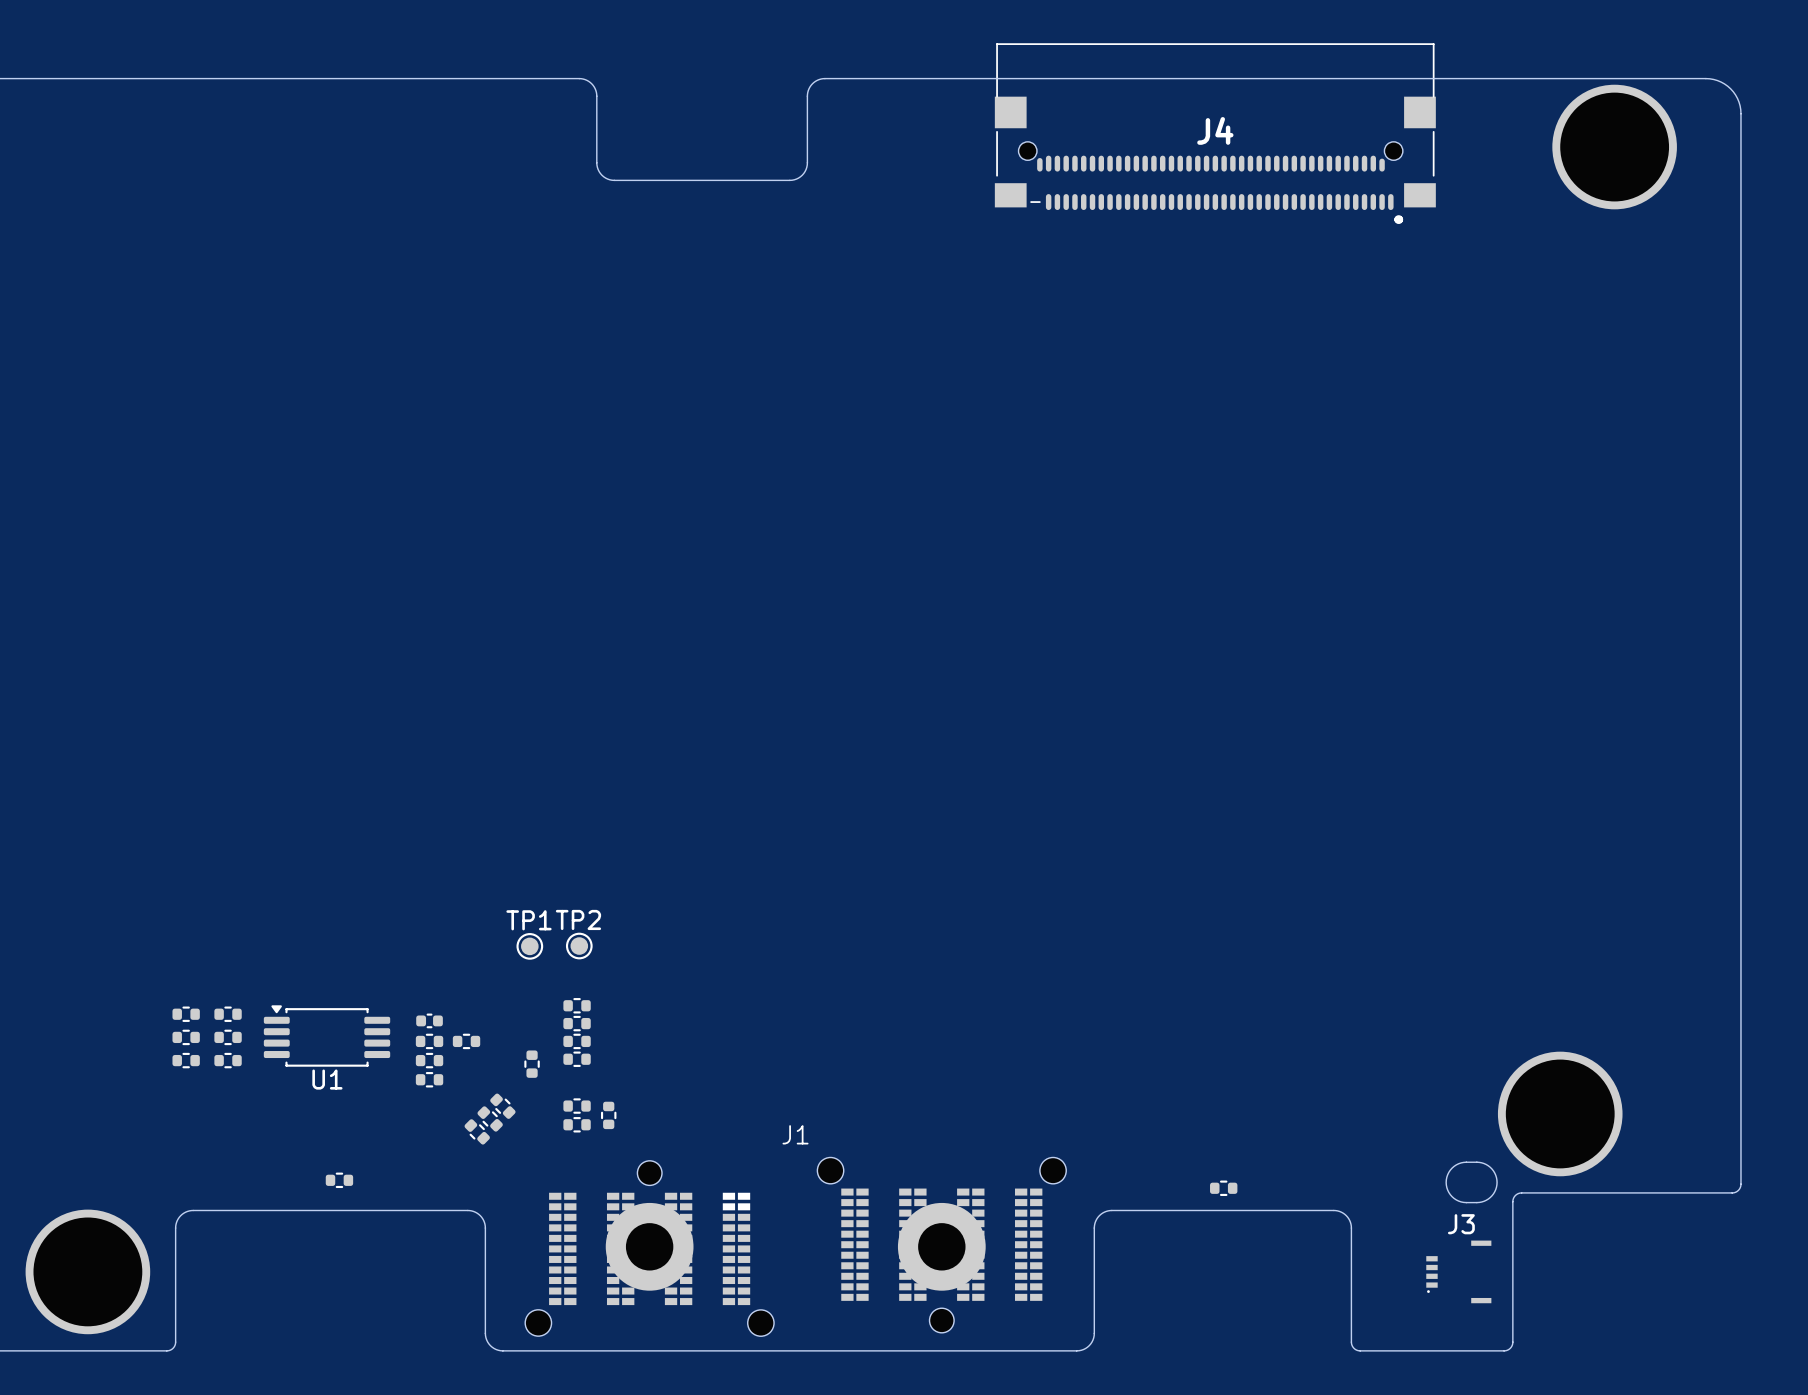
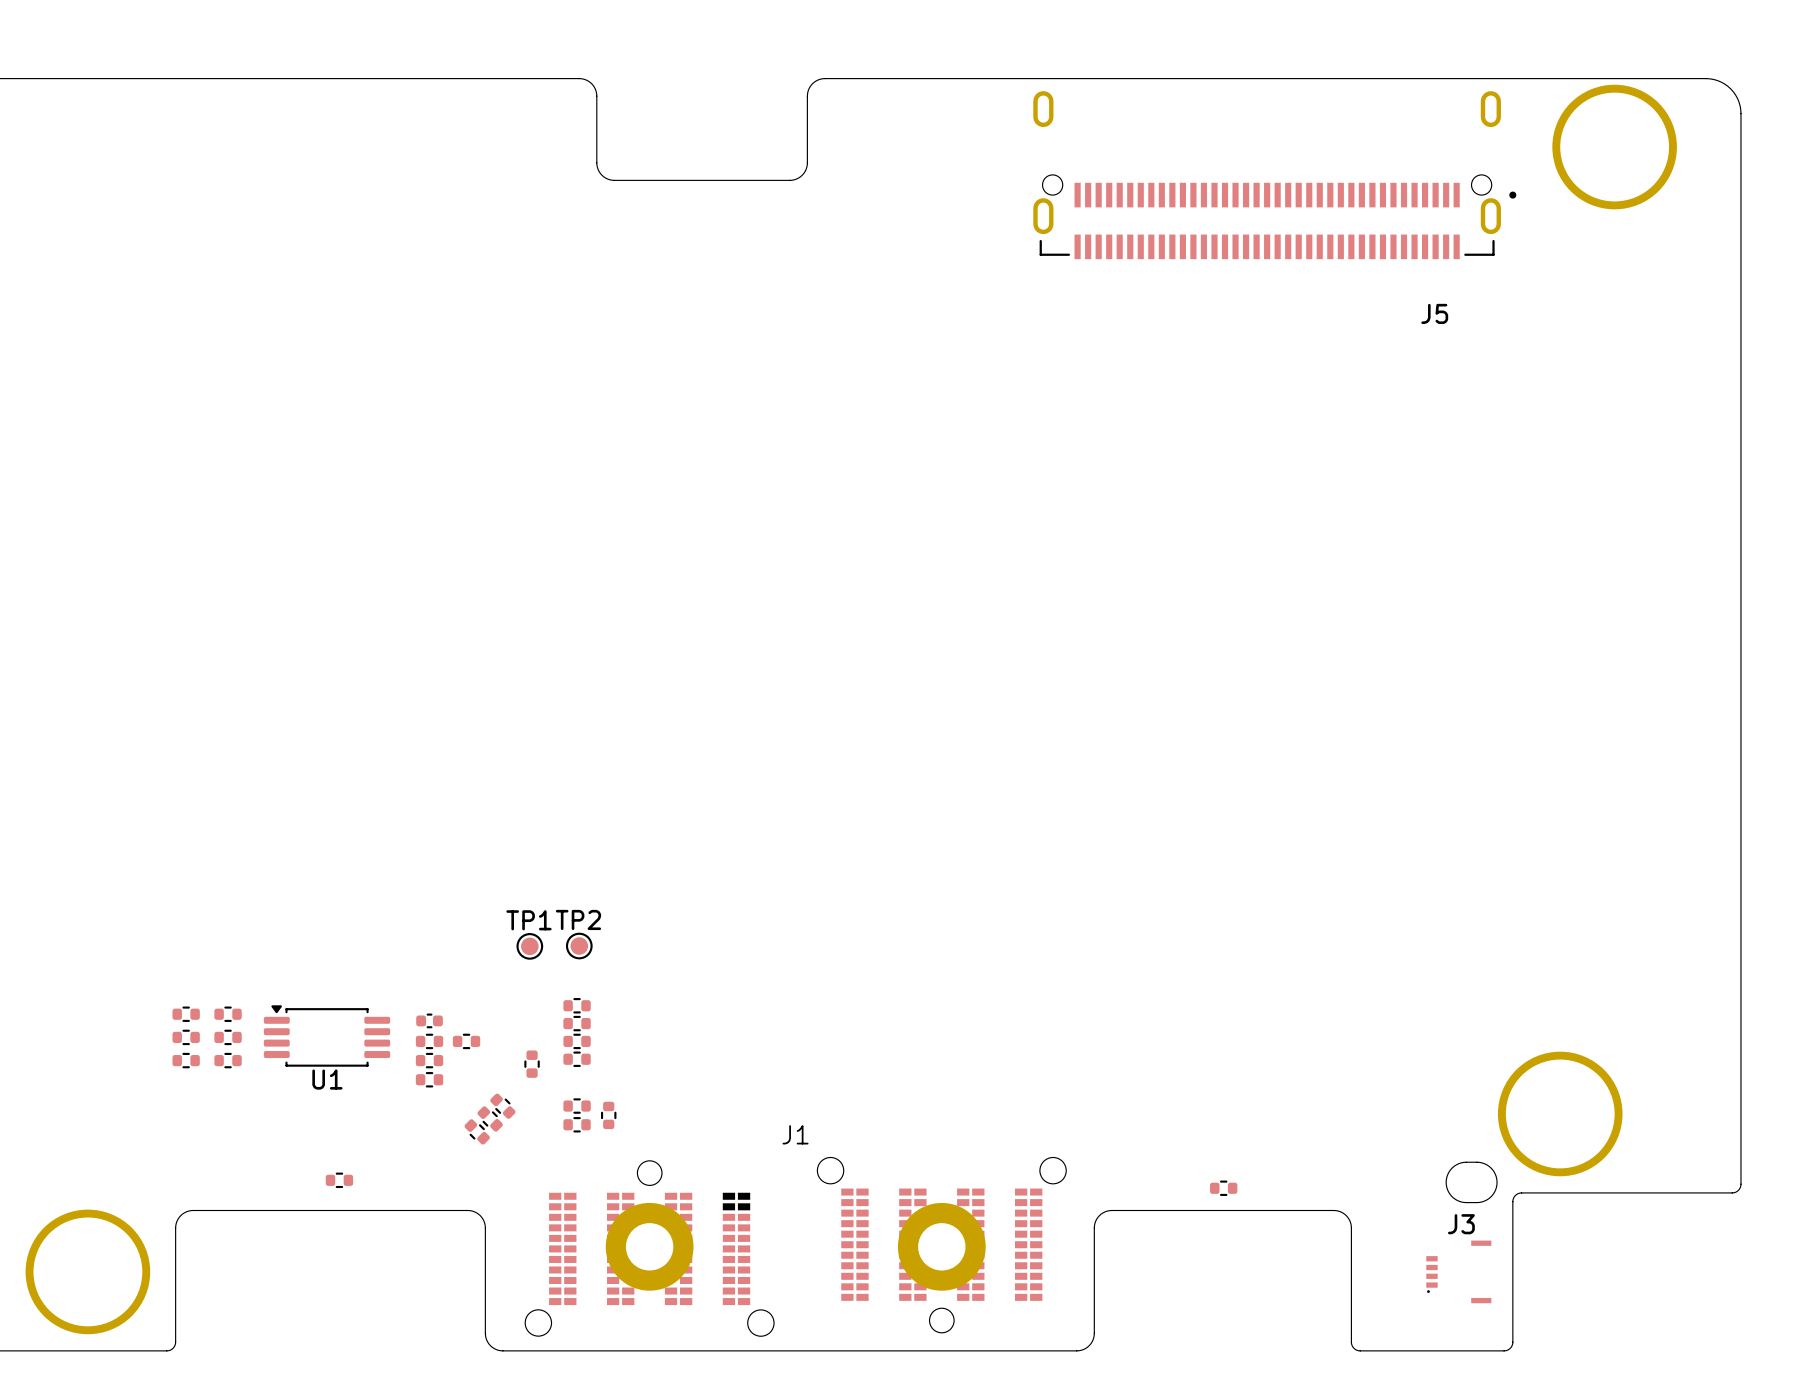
J4: (1215, 133) -> none
J5: none -> (1274, 175)

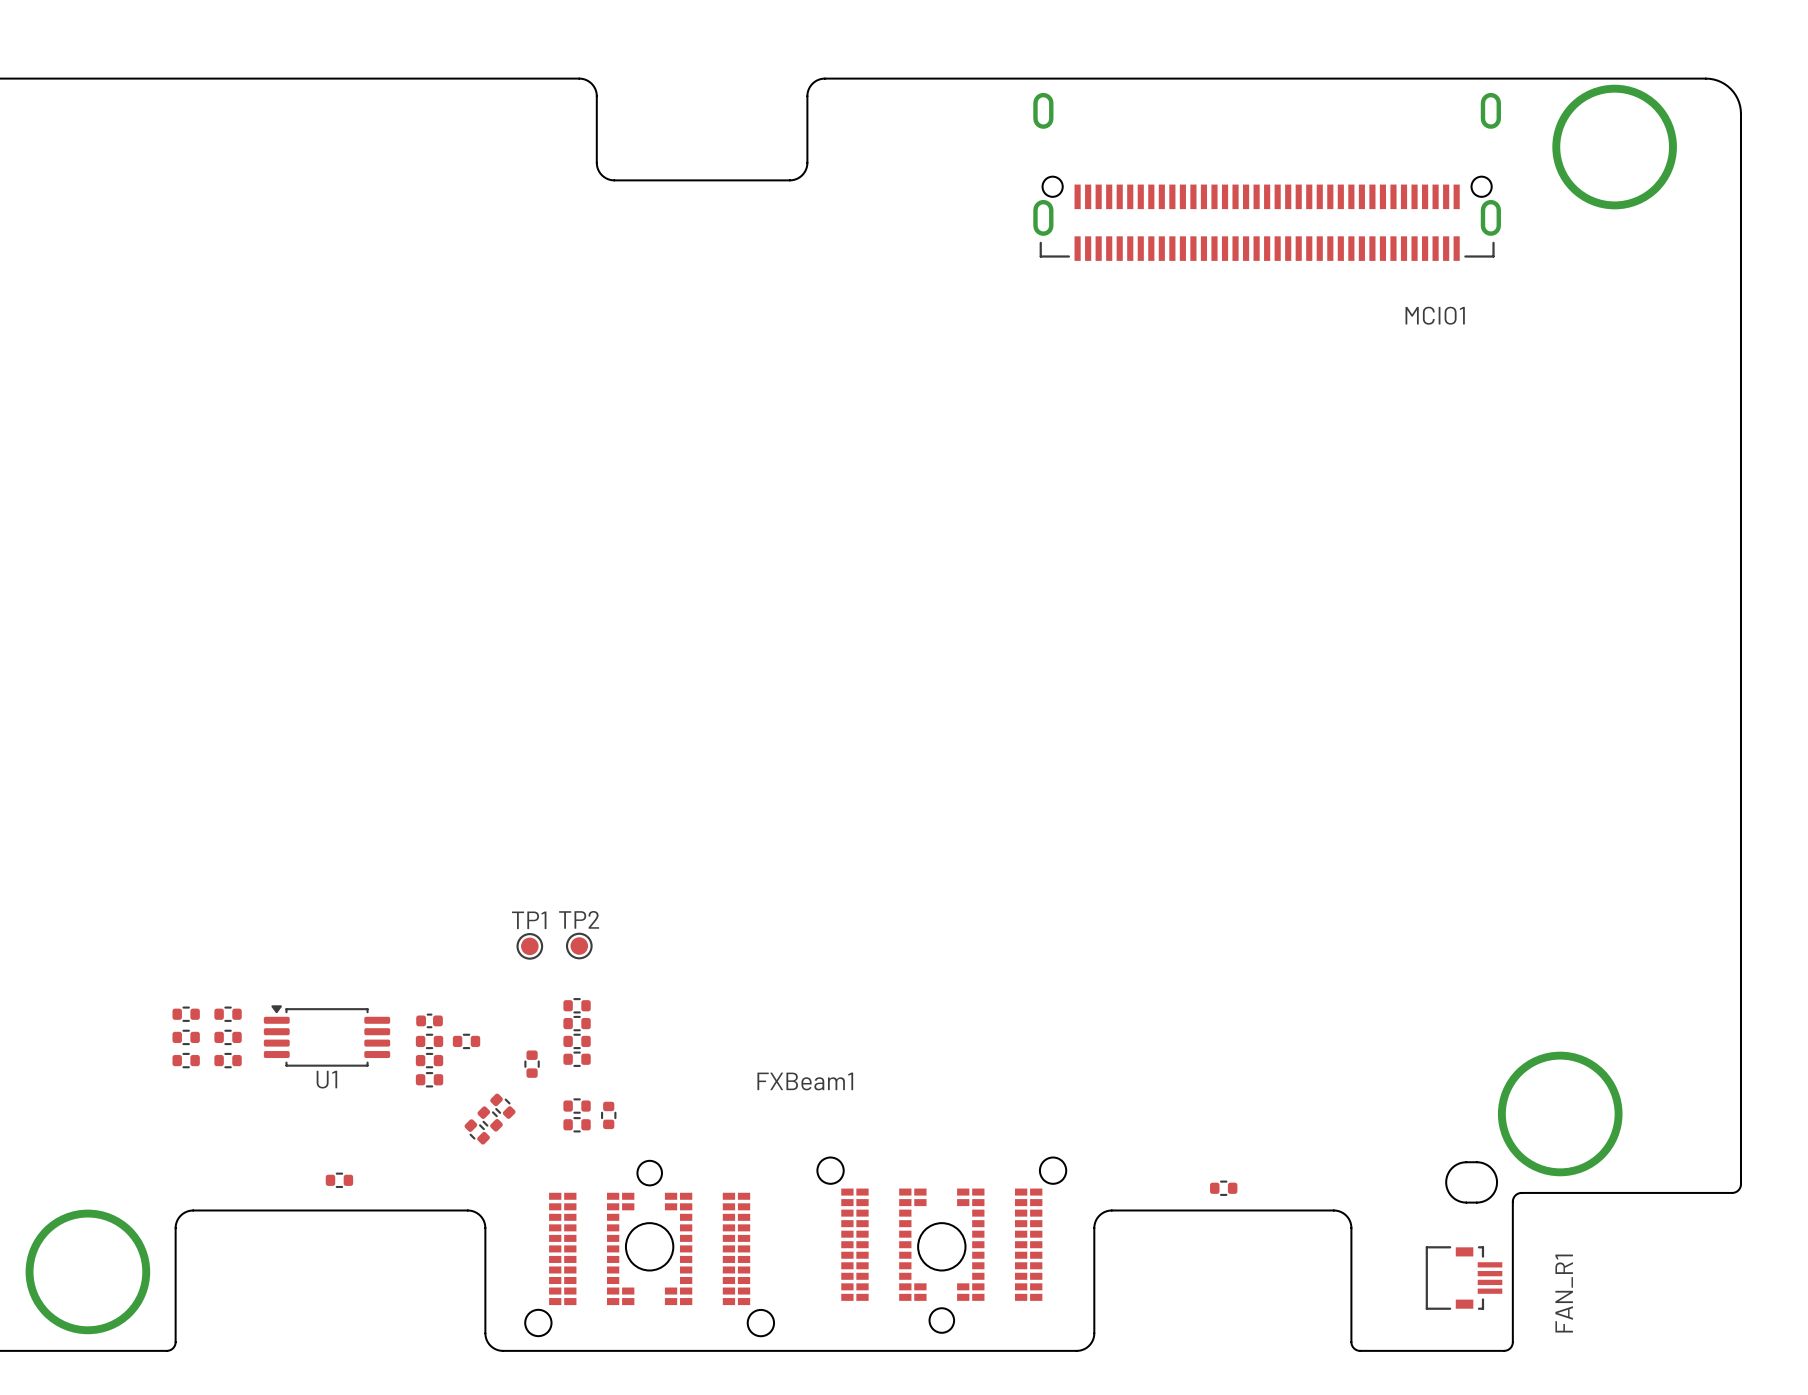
J5: (1274, 175) -> none
MCIO1: none -> (1267, 176)
J1: (795, 1246) -> none
FXBeam1: none -> (795, 1246)
J3: (1458, 1271) -> none
FAN_R1: none -> (1463, 1278)

